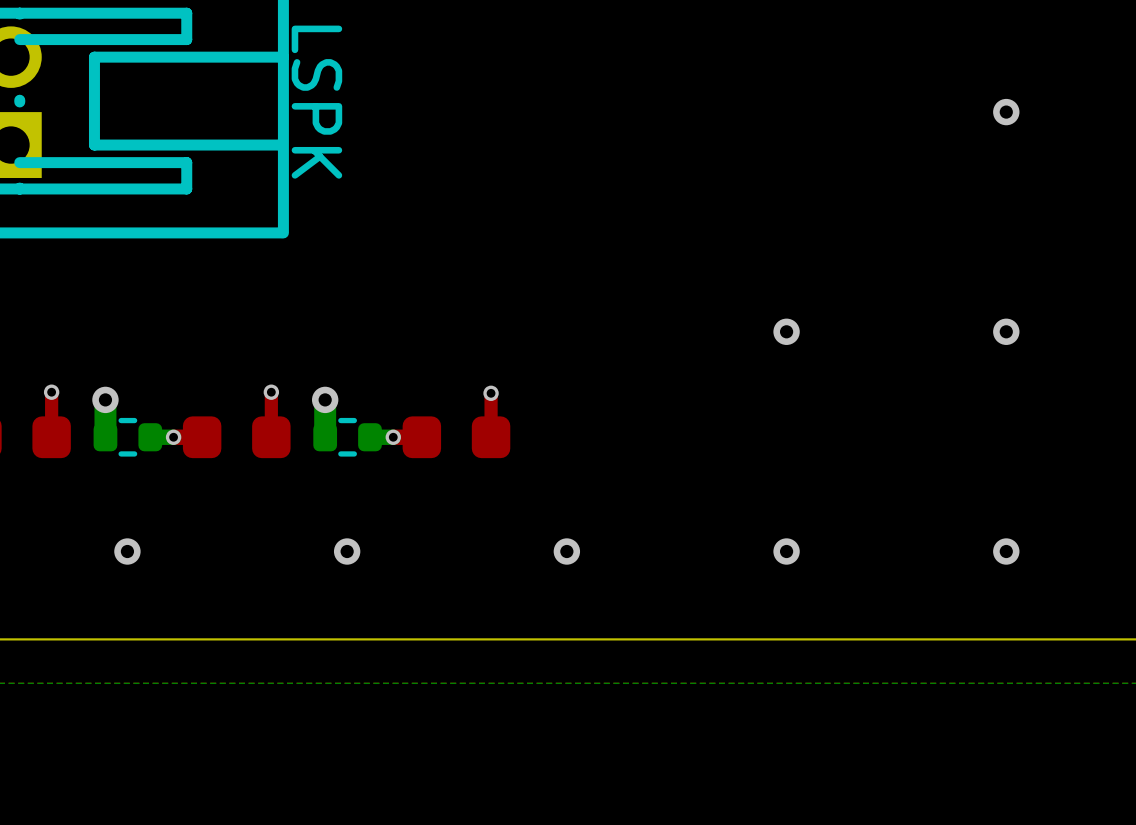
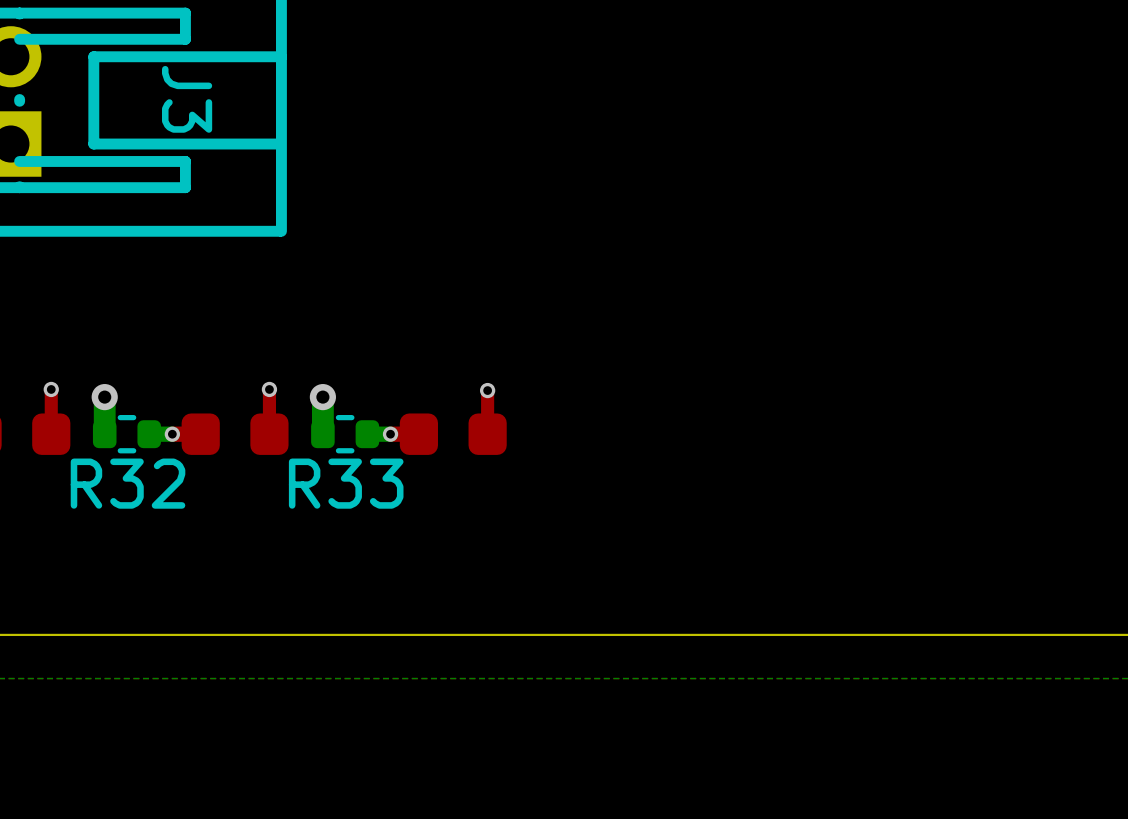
LSPK name: LSPK (316, 102) -> J3 (187, 99)
via: (1006, 112) -> none
via: (786, 331) -> none
via: (1006, 331) -> none
R32 name: none -> R32 (128, 483)
R33 name: none -> R33 (346, 483)
via: (127, 551) -> none
via: (347, 551) -> none
via: (566, 551) -> none
via: (786, 551) -> none
via: (1006, 551) -> none

